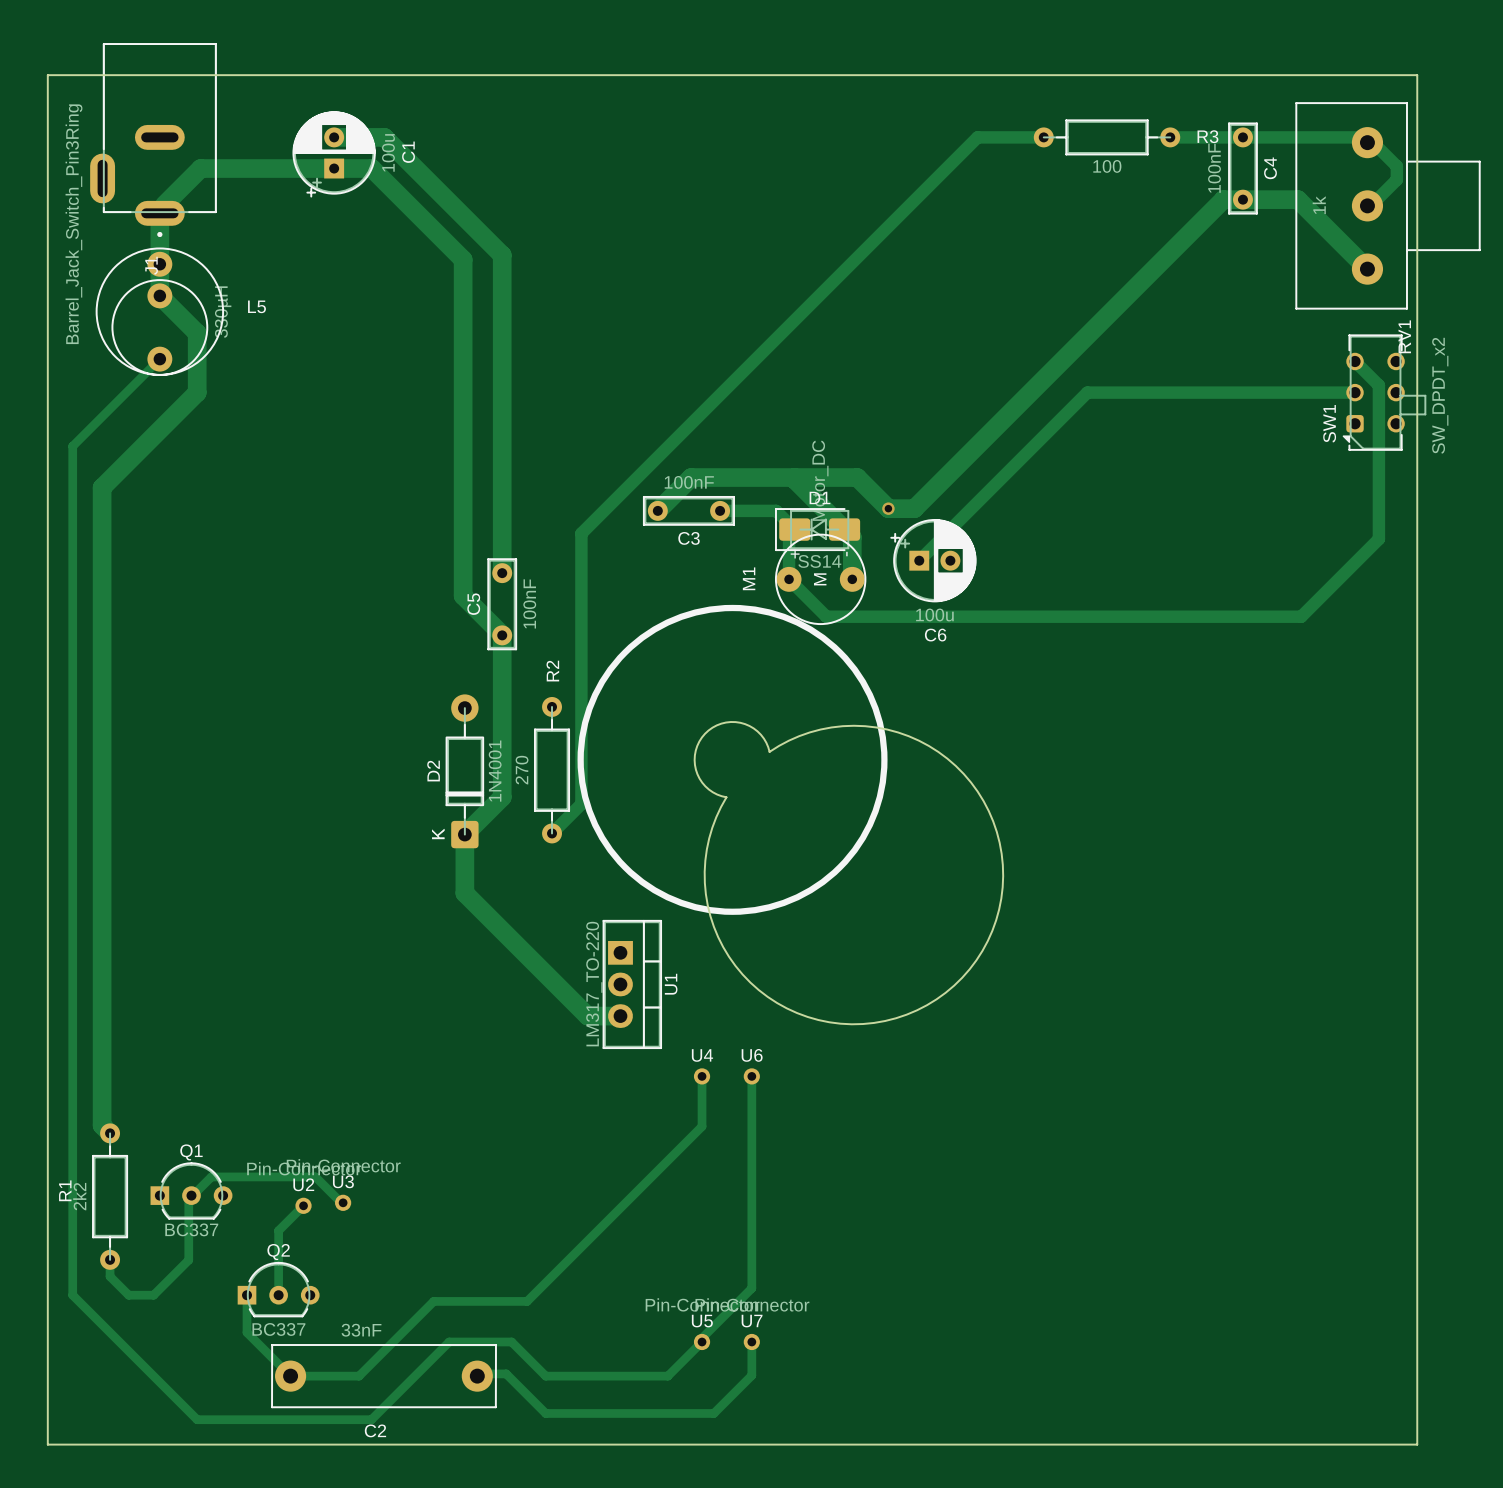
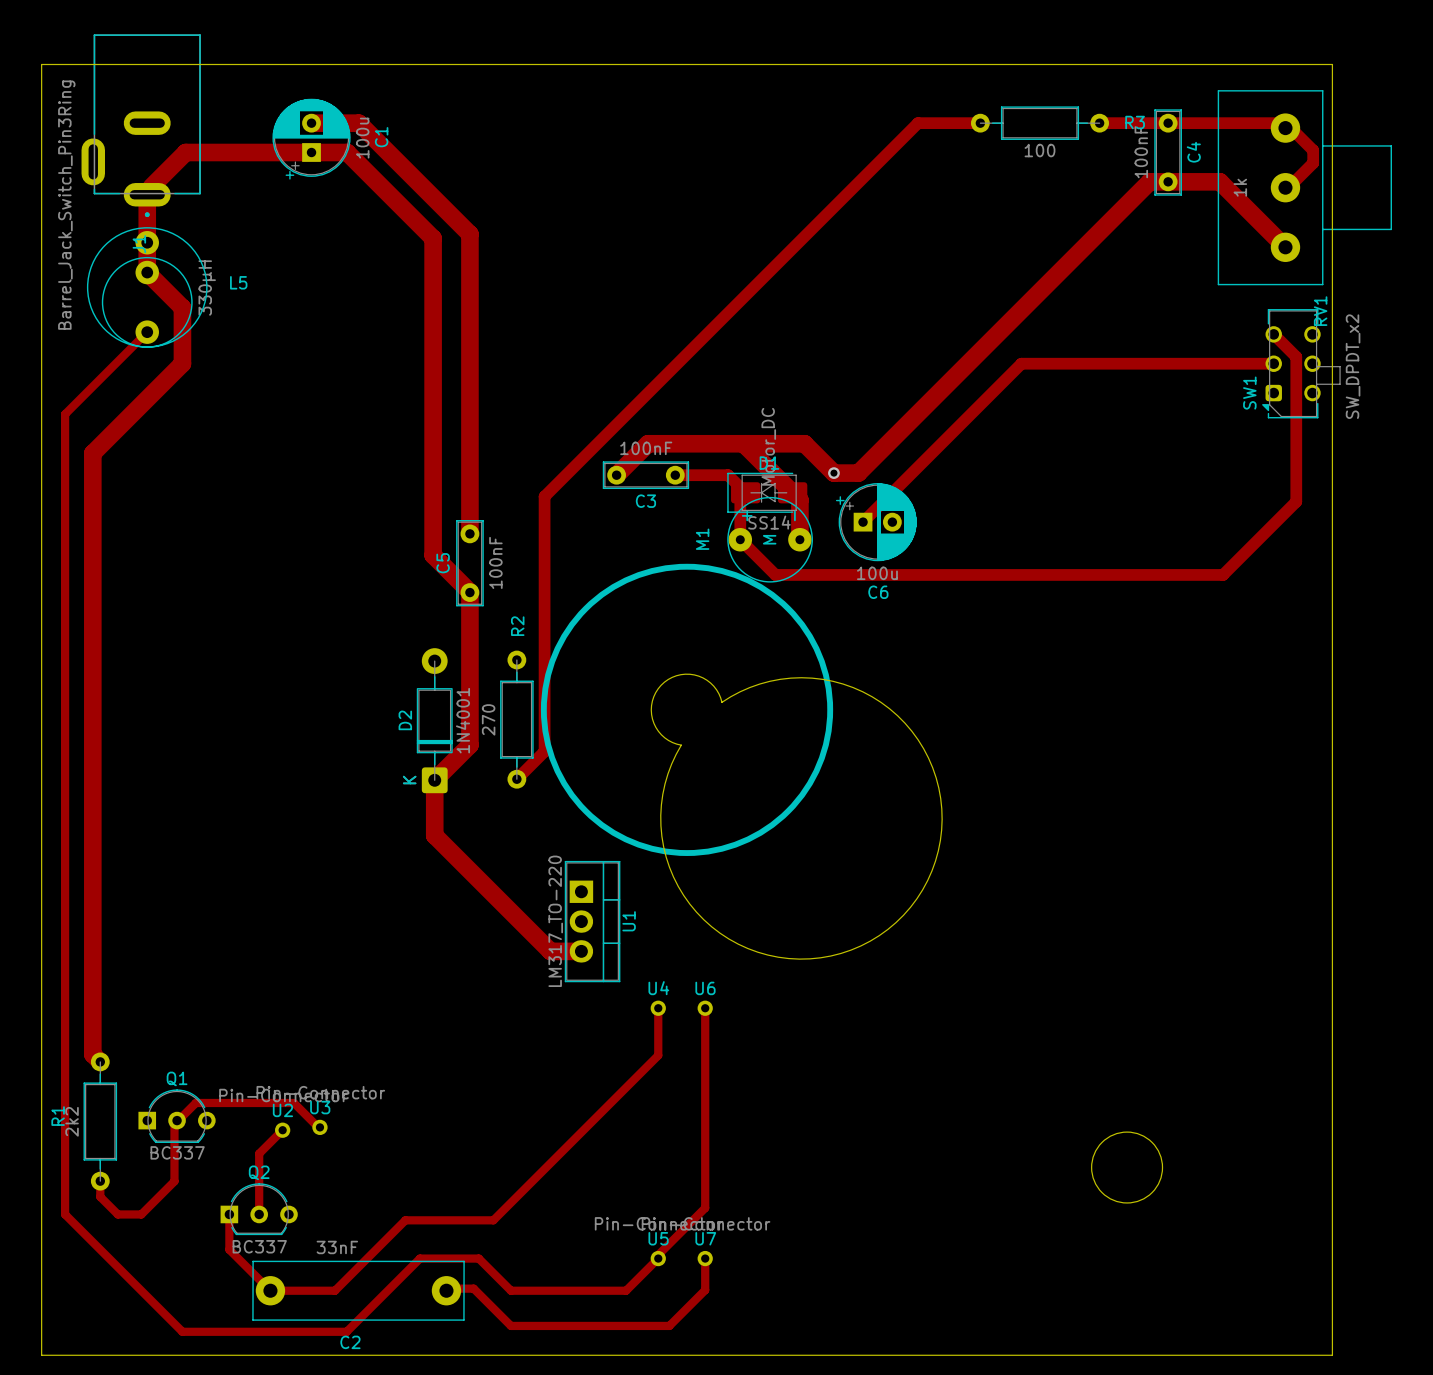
round board edge: none -> [1091, 1131, 1163, 1204]

